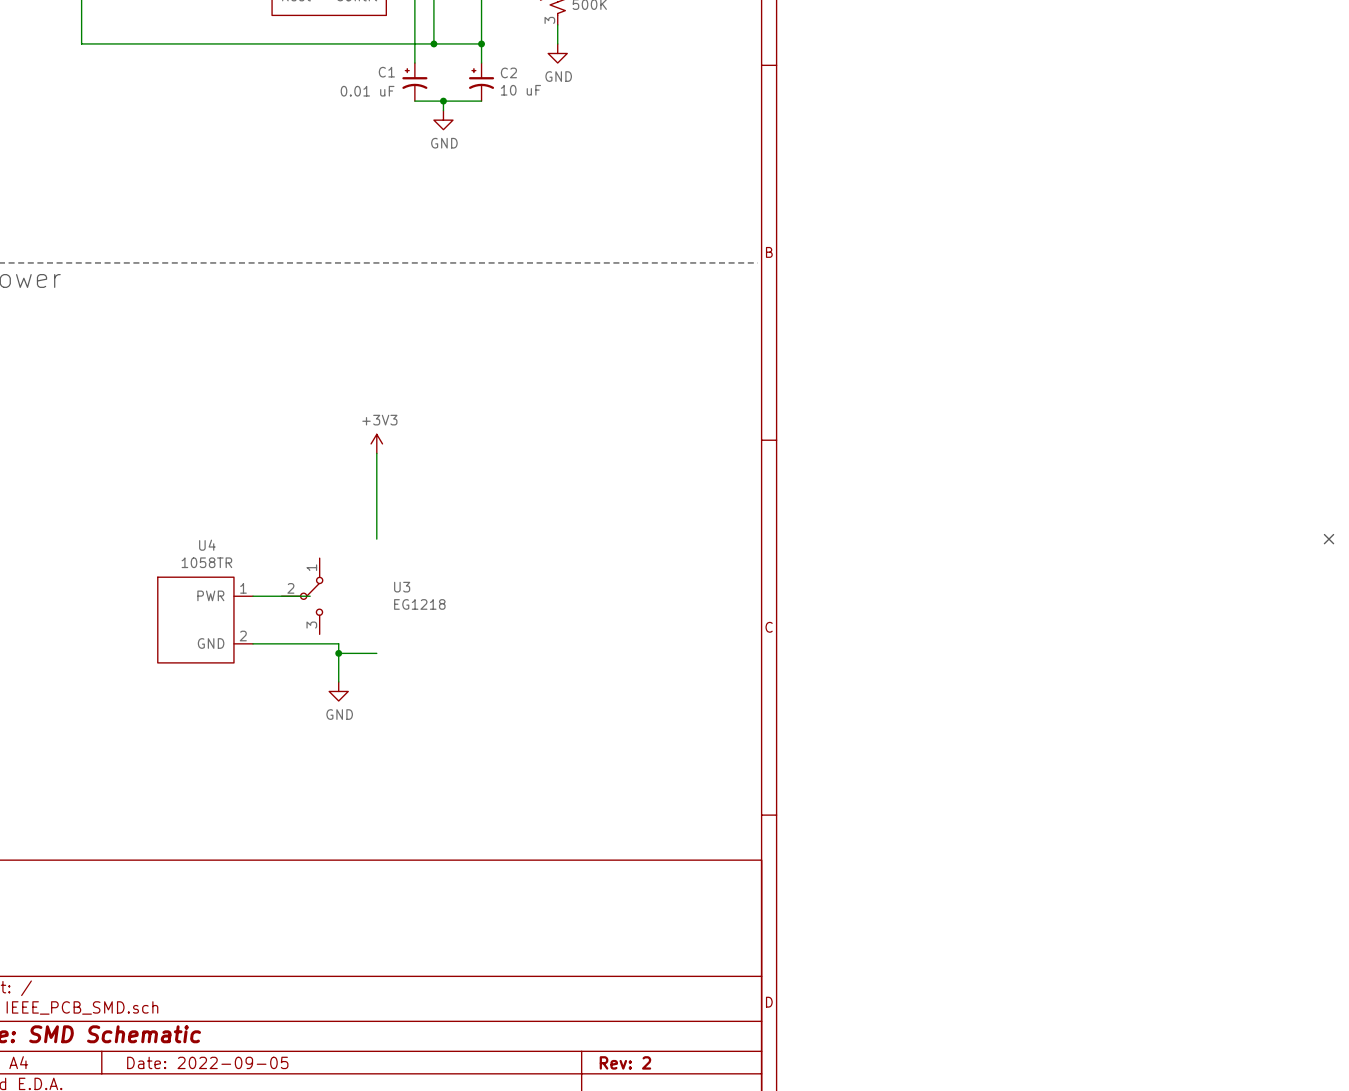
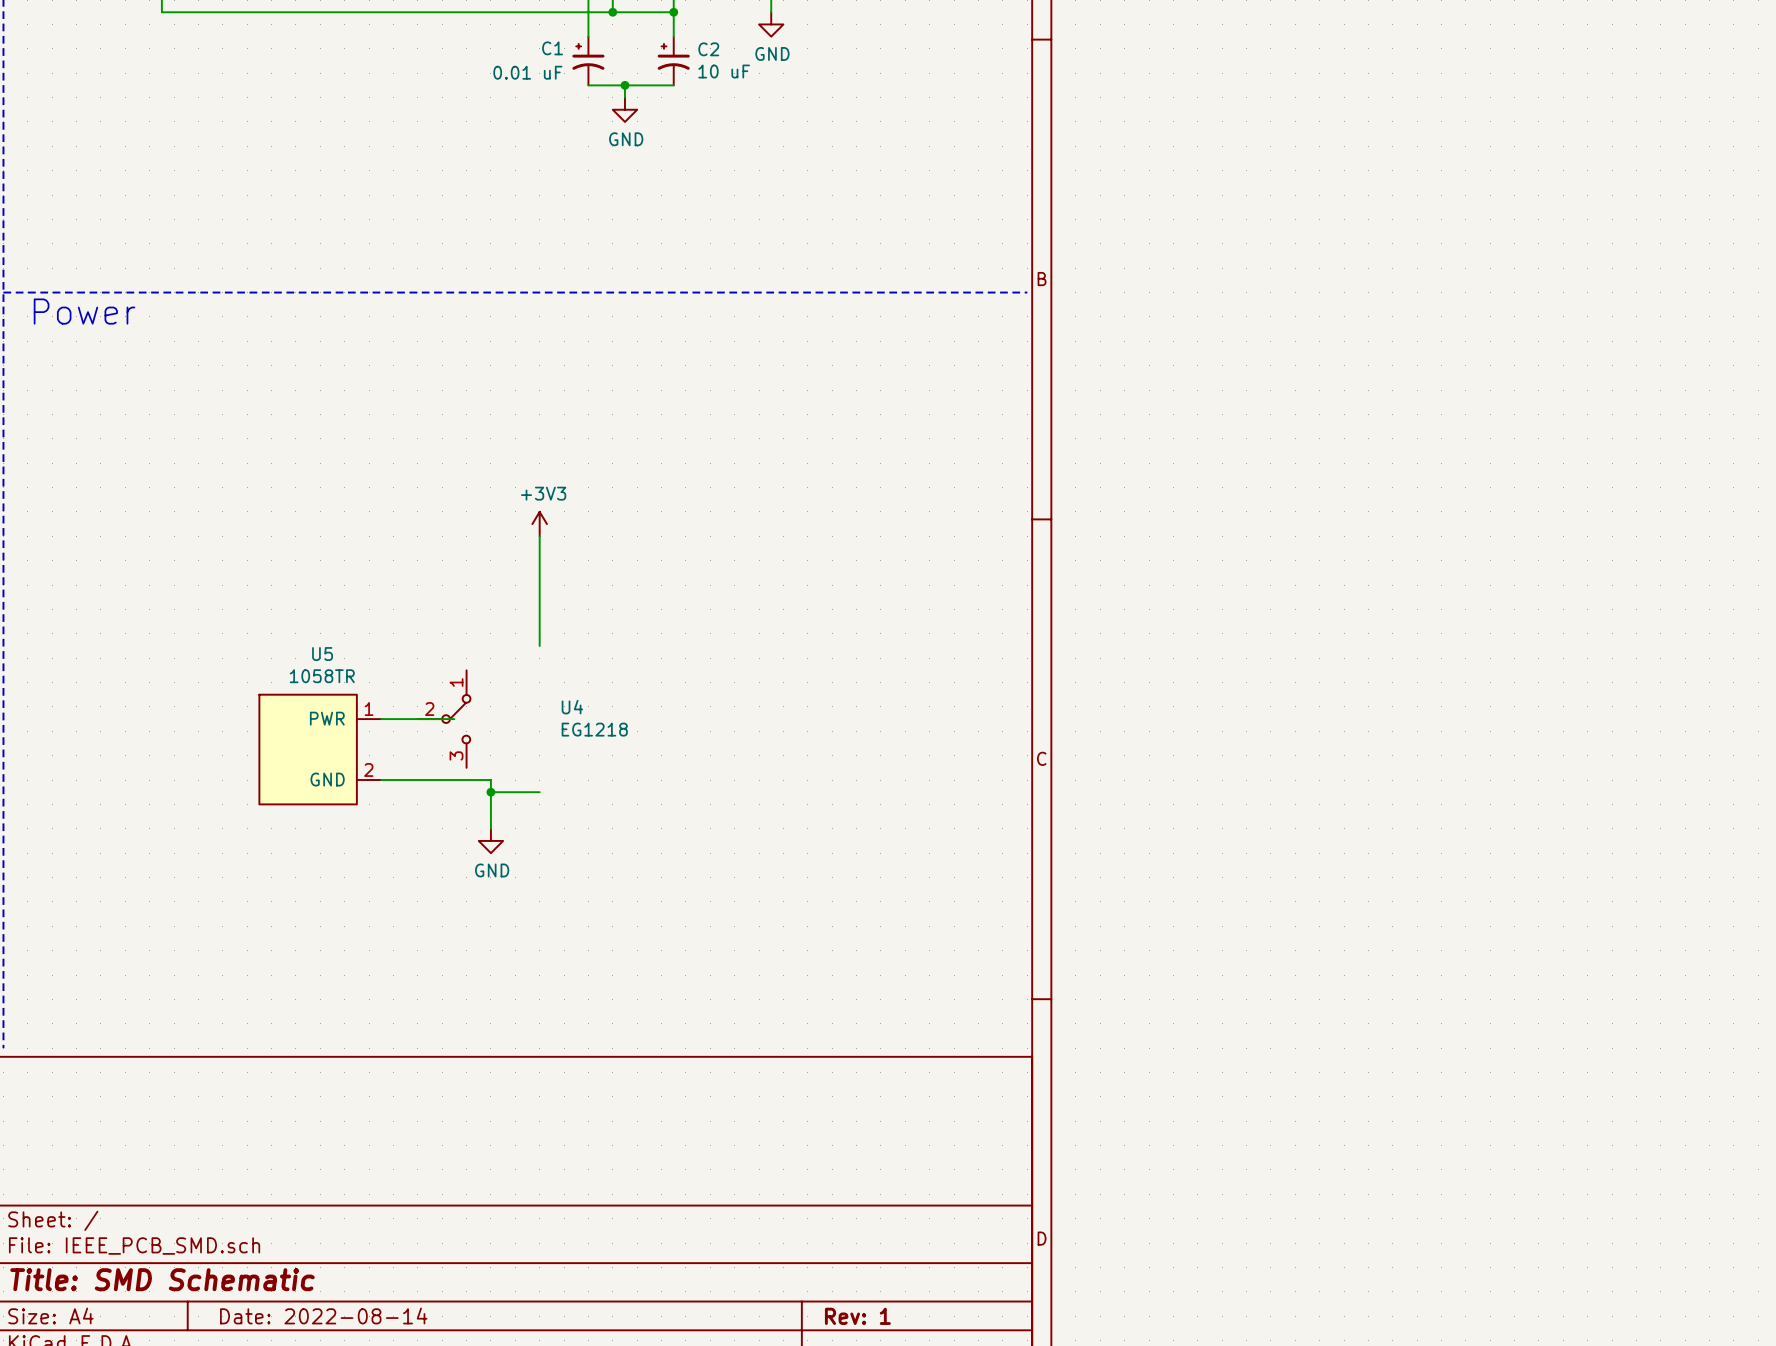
no-connect mark: (1329, 539) -> none
U4 name: U4 (207, 545) -> U5 (322, 654)
U3 name: U3 (402, 587) -> U4 (572, 707)
title block: Date: 2022-09-05 (207, 1062) -> Date: 2022-08-14 (323, 1315)
title block: Rev: 2 (625, 1062) -> Rev: 1 (857, 1316)

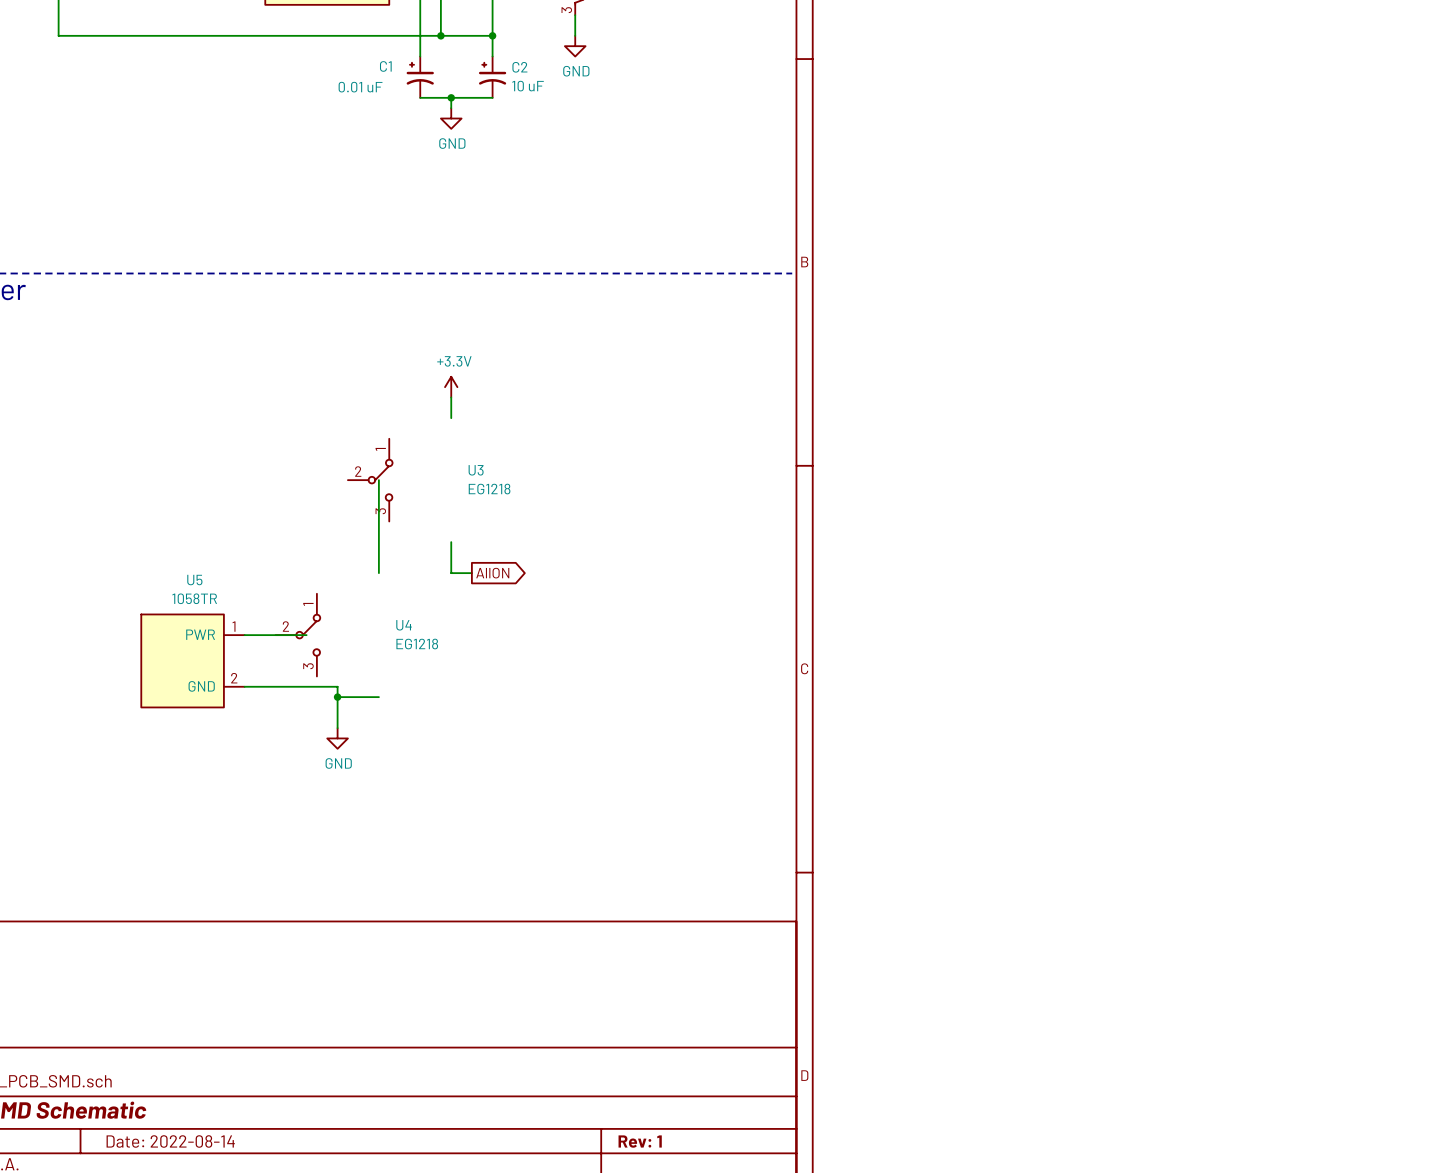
power symbol: none -> +3.3V (451, 387)
wire: none -> (451, 397) (451, 418)
power symbol: +3V3 (539, 524) -> none
U3: none -> EG1218 (370, 480)
wire: none -> (451, 542) (451, 573) (471, 573)
global label: none -> AllON (492, 573)

